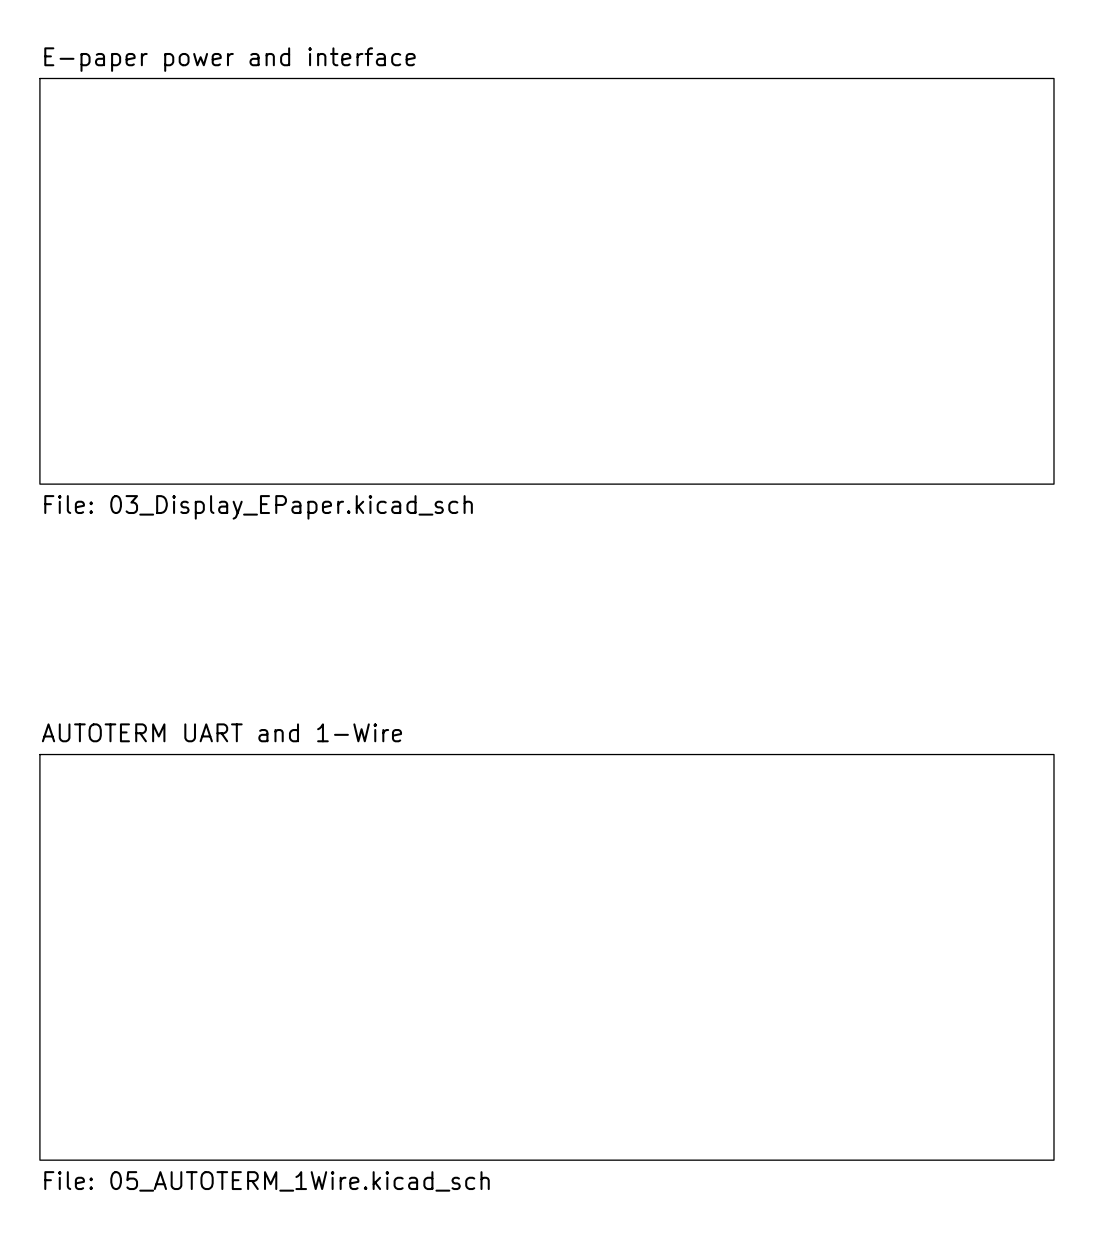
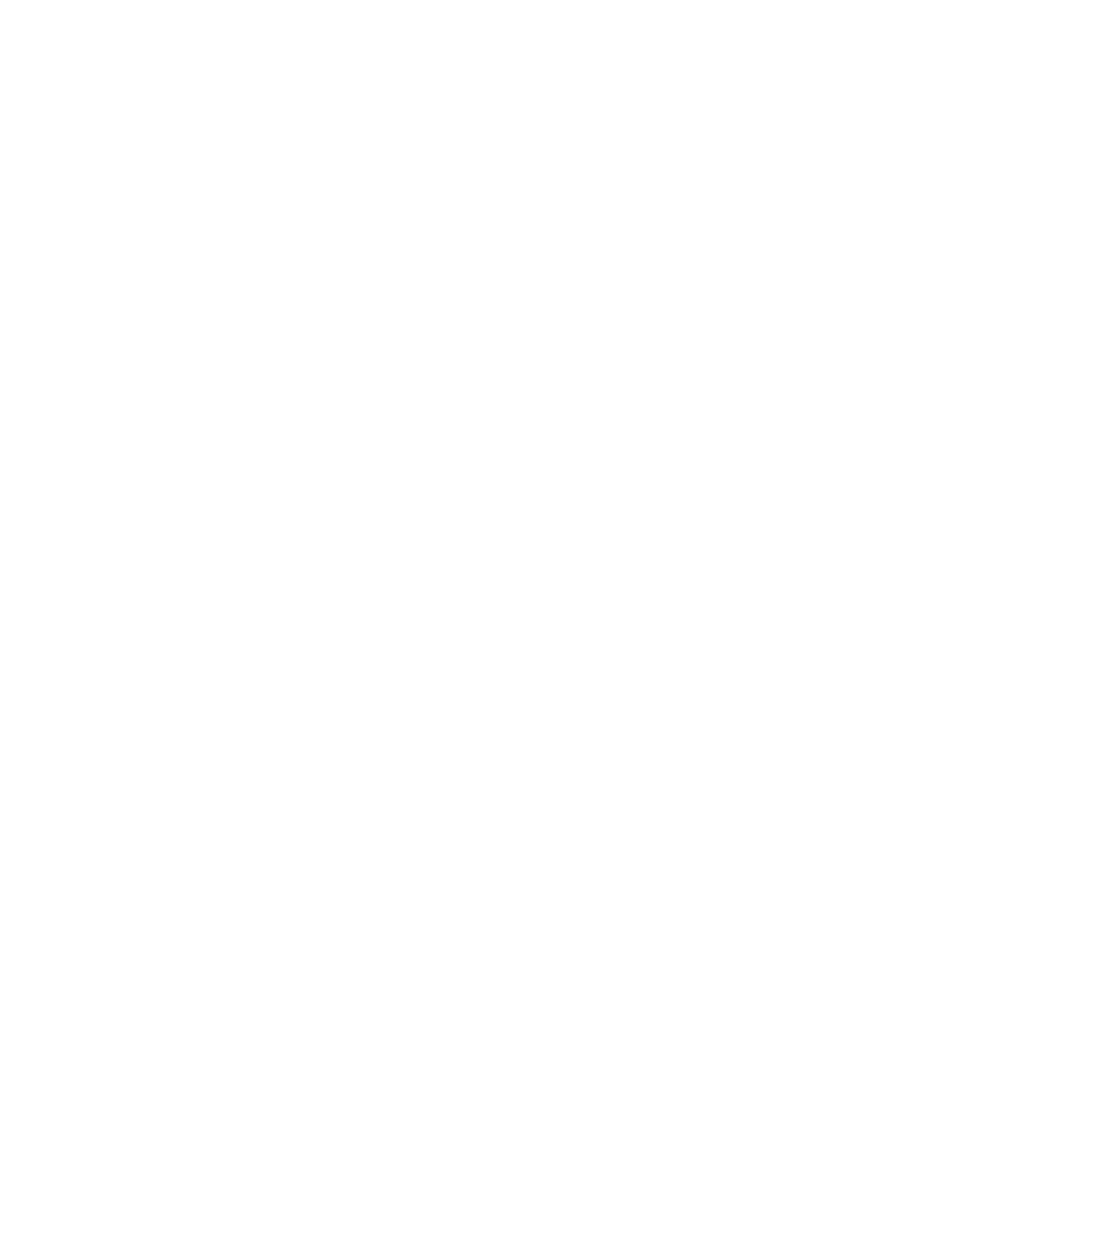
sheet E-paper power and interface: File: 03_Display_EPaper.kicad_sch (546, 281) -> none
sheet AUTOTERM UART and 1-Wire: File: 05_AUTOTERM_1Wire.kicad_sch (546, 957) -> none

